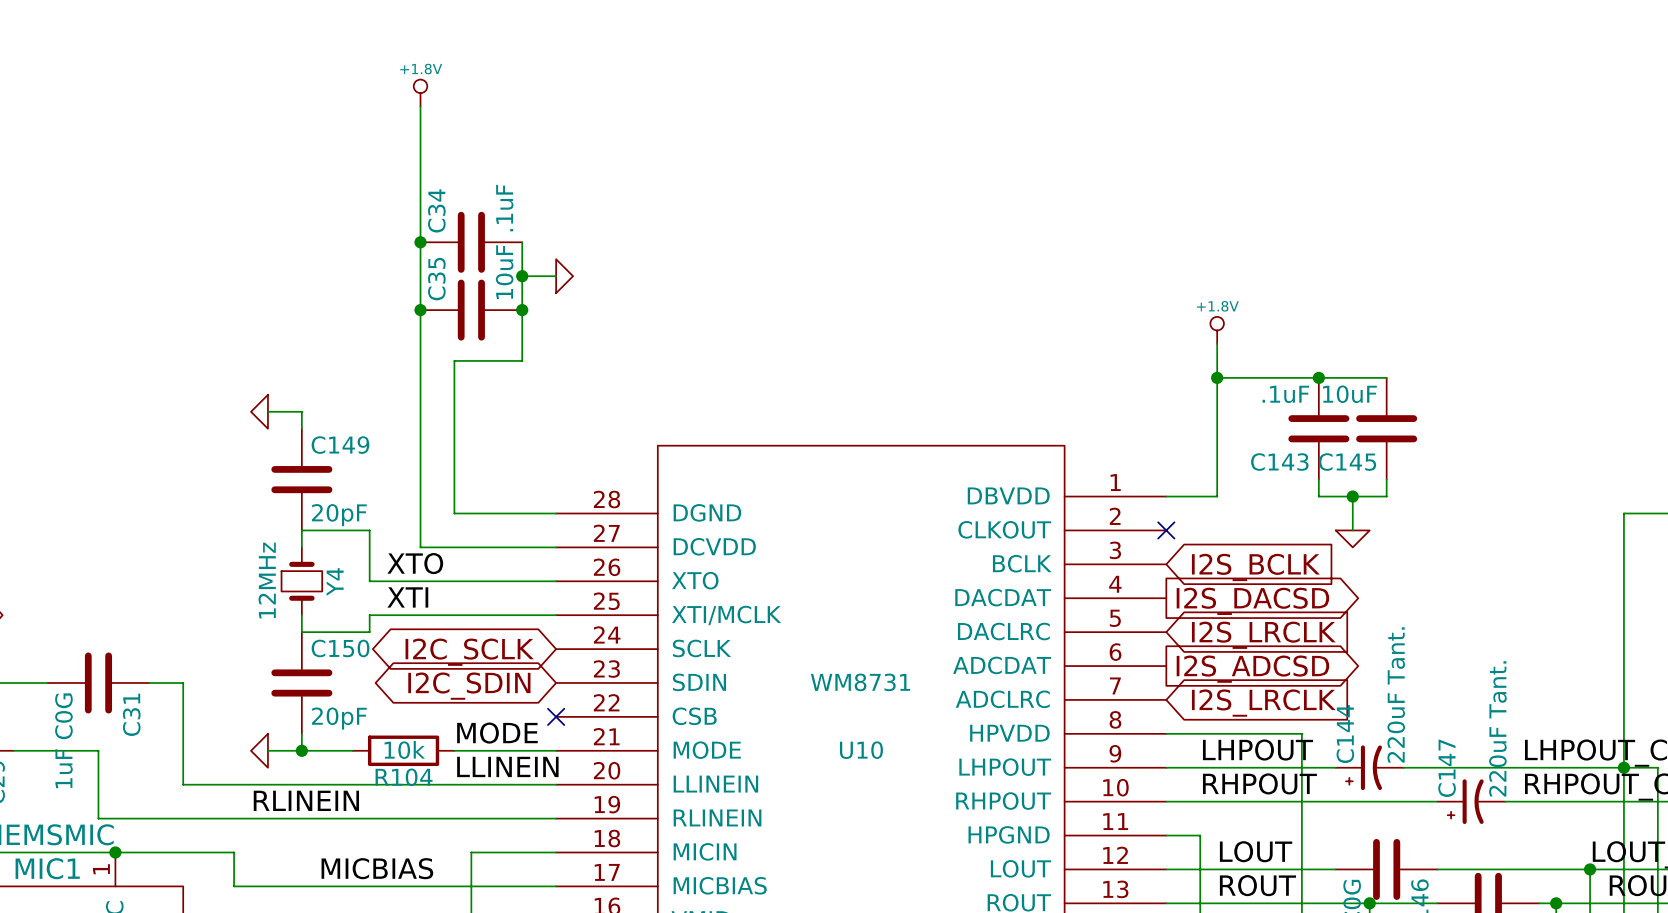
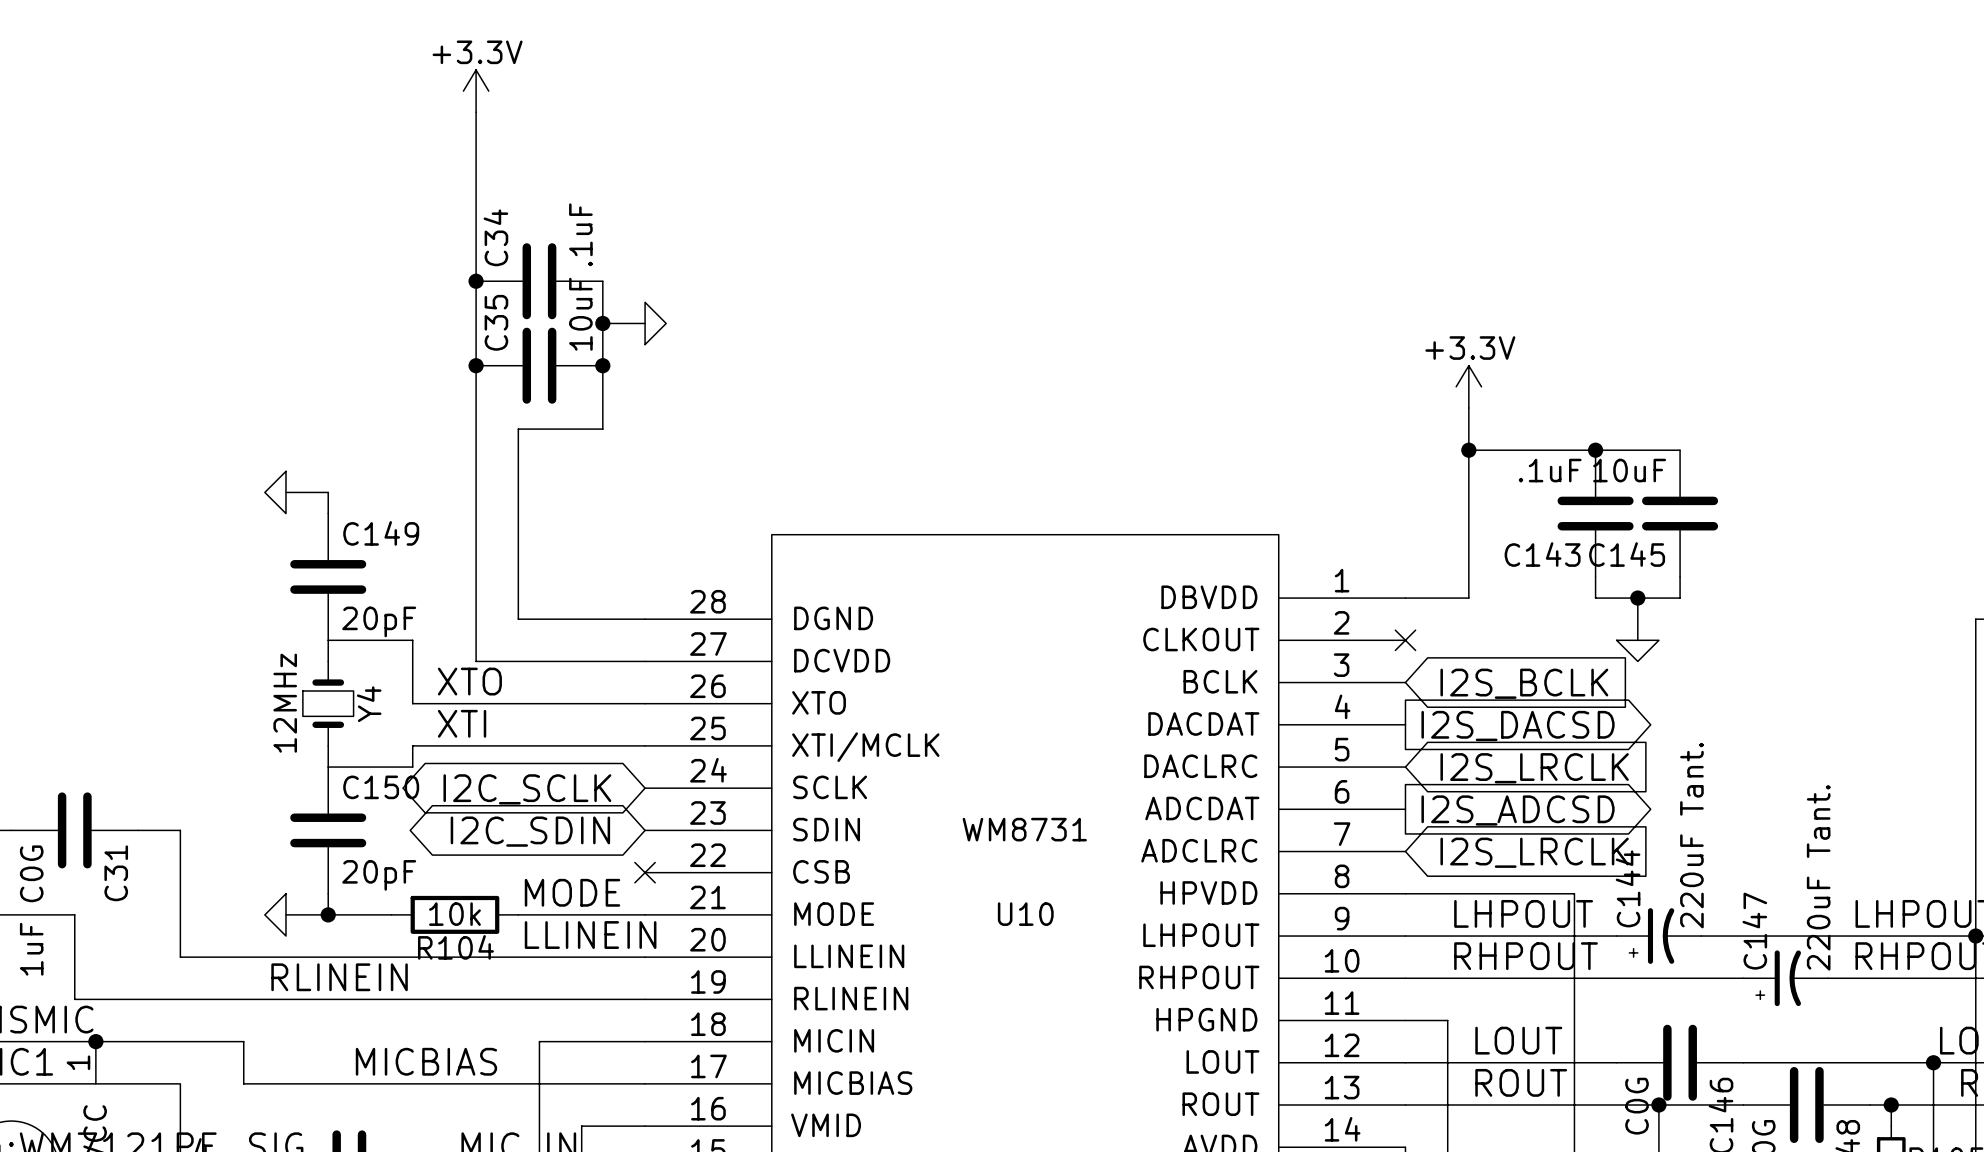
power symbol: +1.8V (420, 93) -> +3.3V (476, 91)
power symbol: +1.8V (1217, 330) -> +3.3V (1468, 386)

